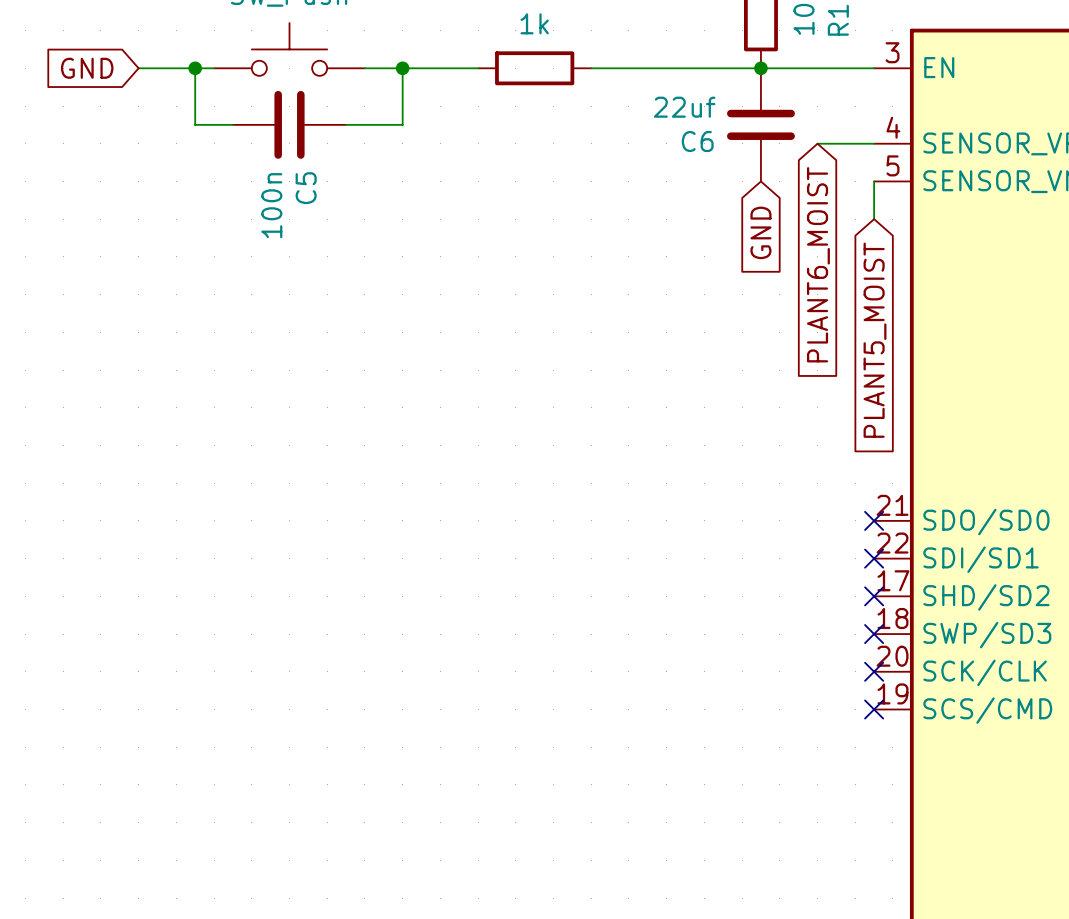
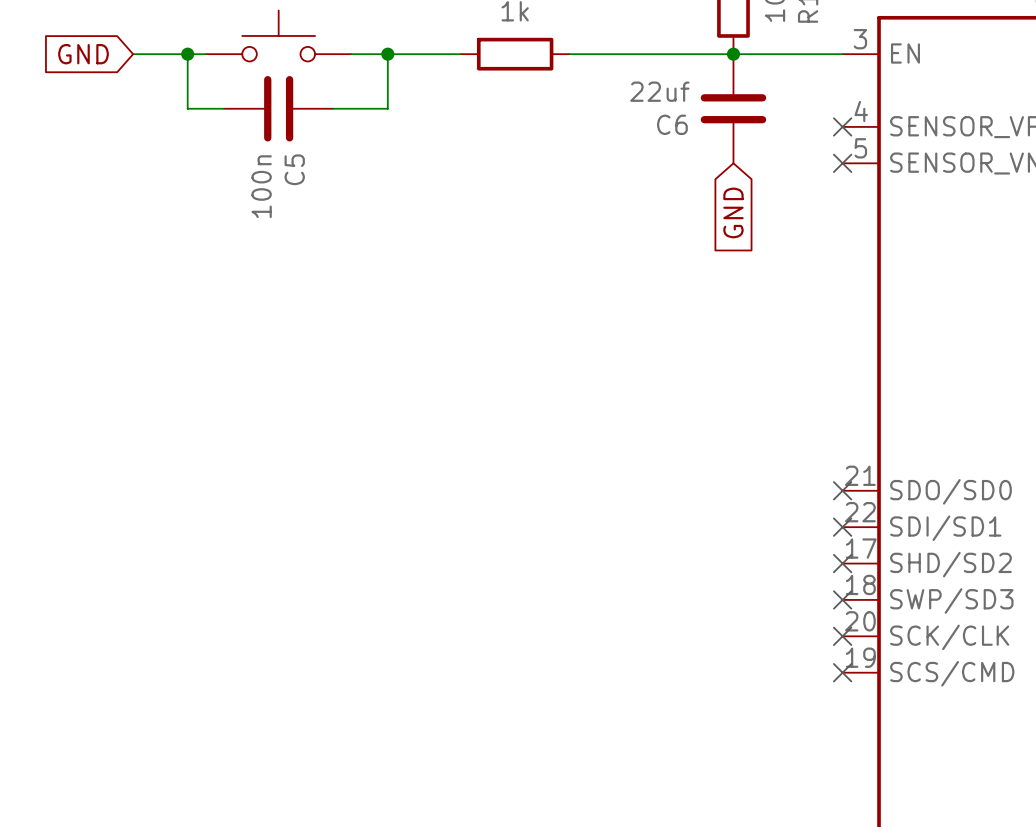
wire: (817, 143) (874, 143) -> none
no-connect mark: none -> (842, 126)
wire: (874, 181) (874, 219) -> none
no-connect mark: none -> (842, 163)
global label: PLANT6_MOIST (818, 264) -> none
global label: PLANT5_MOIST (875, 340) -> none

